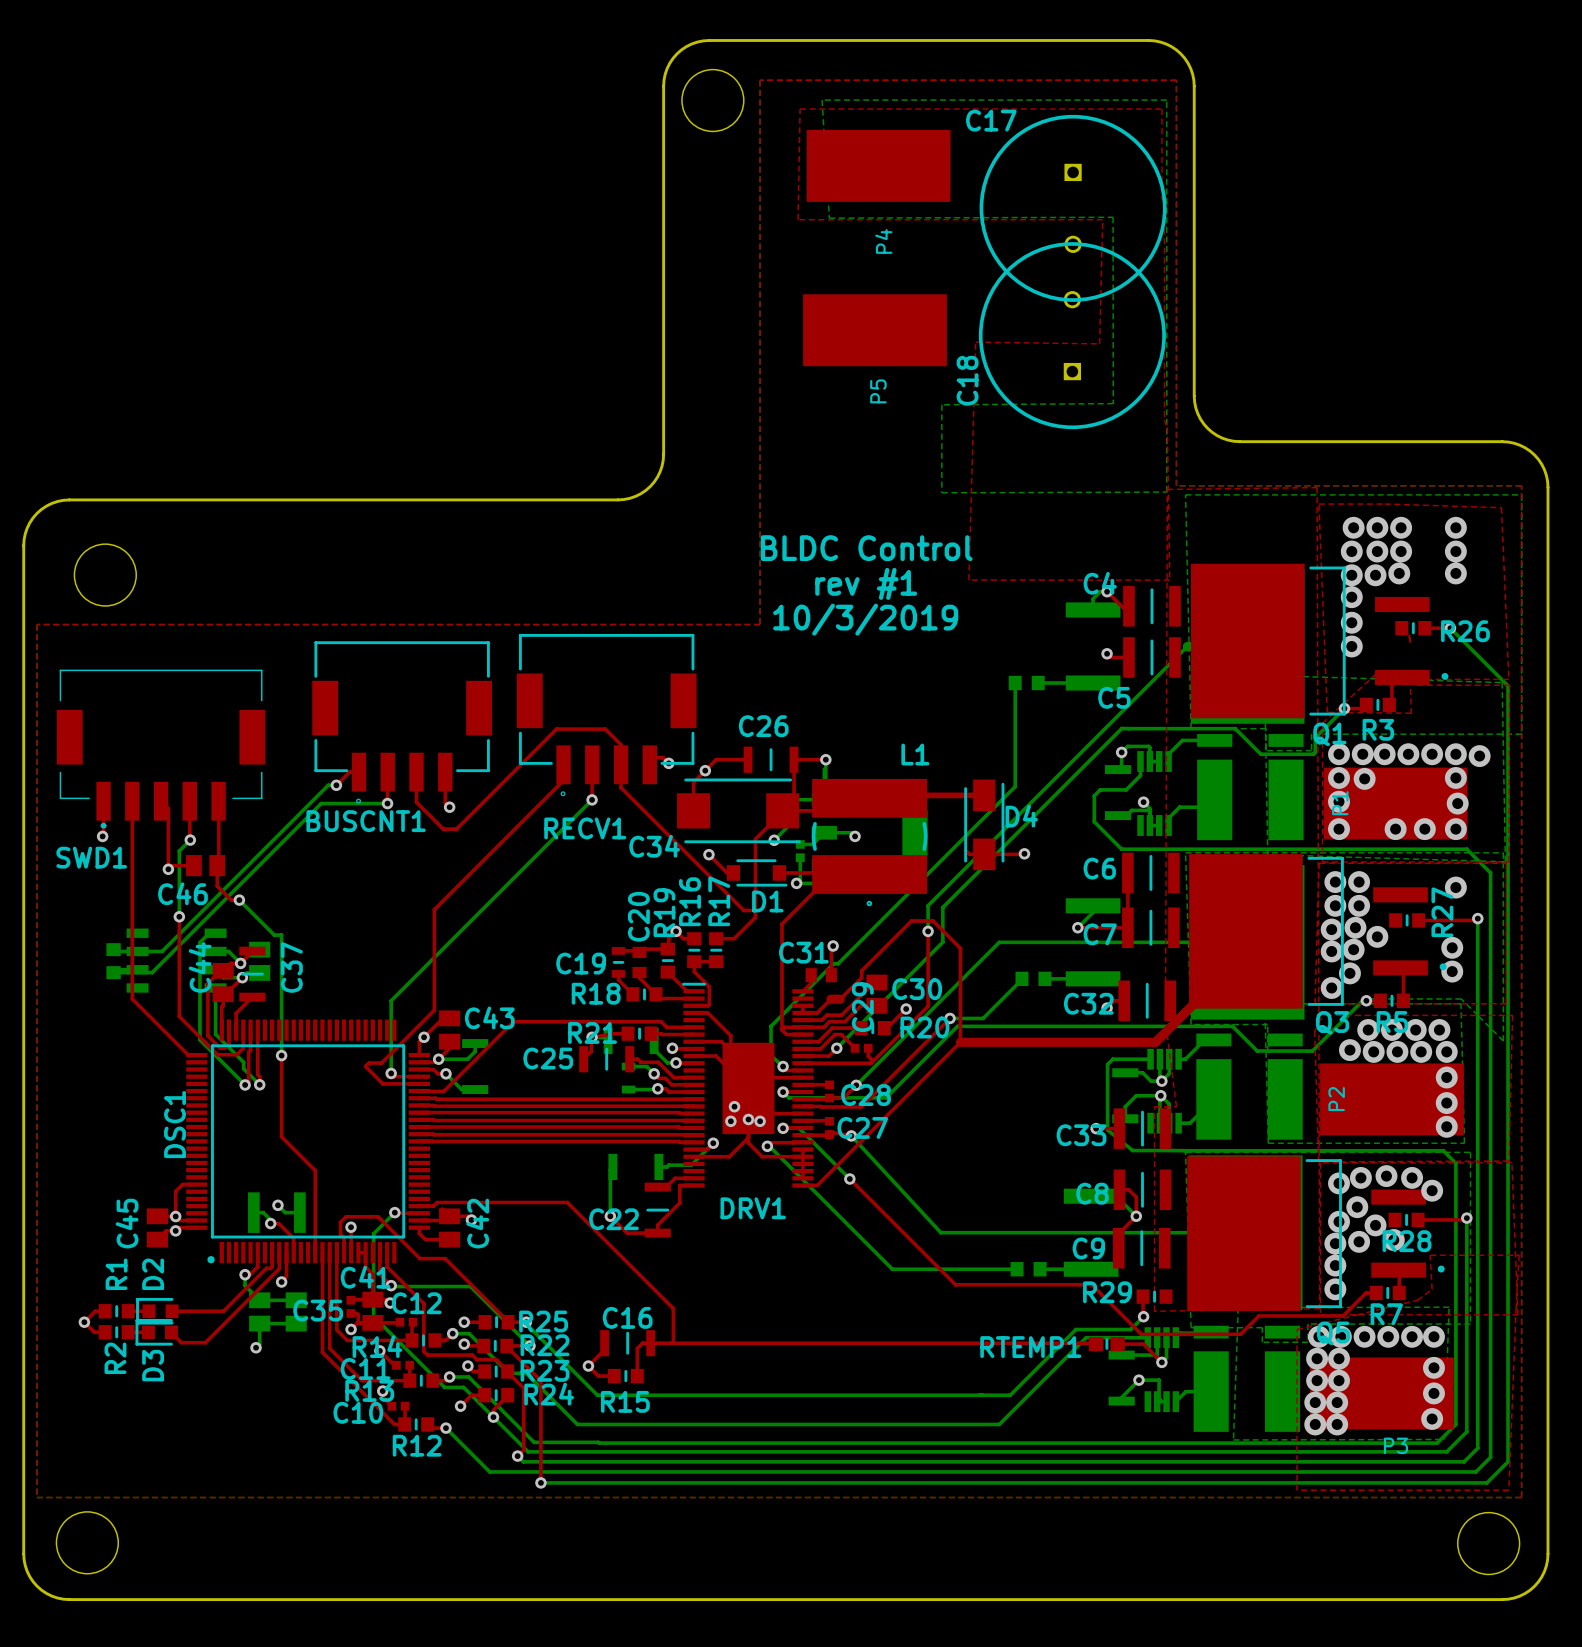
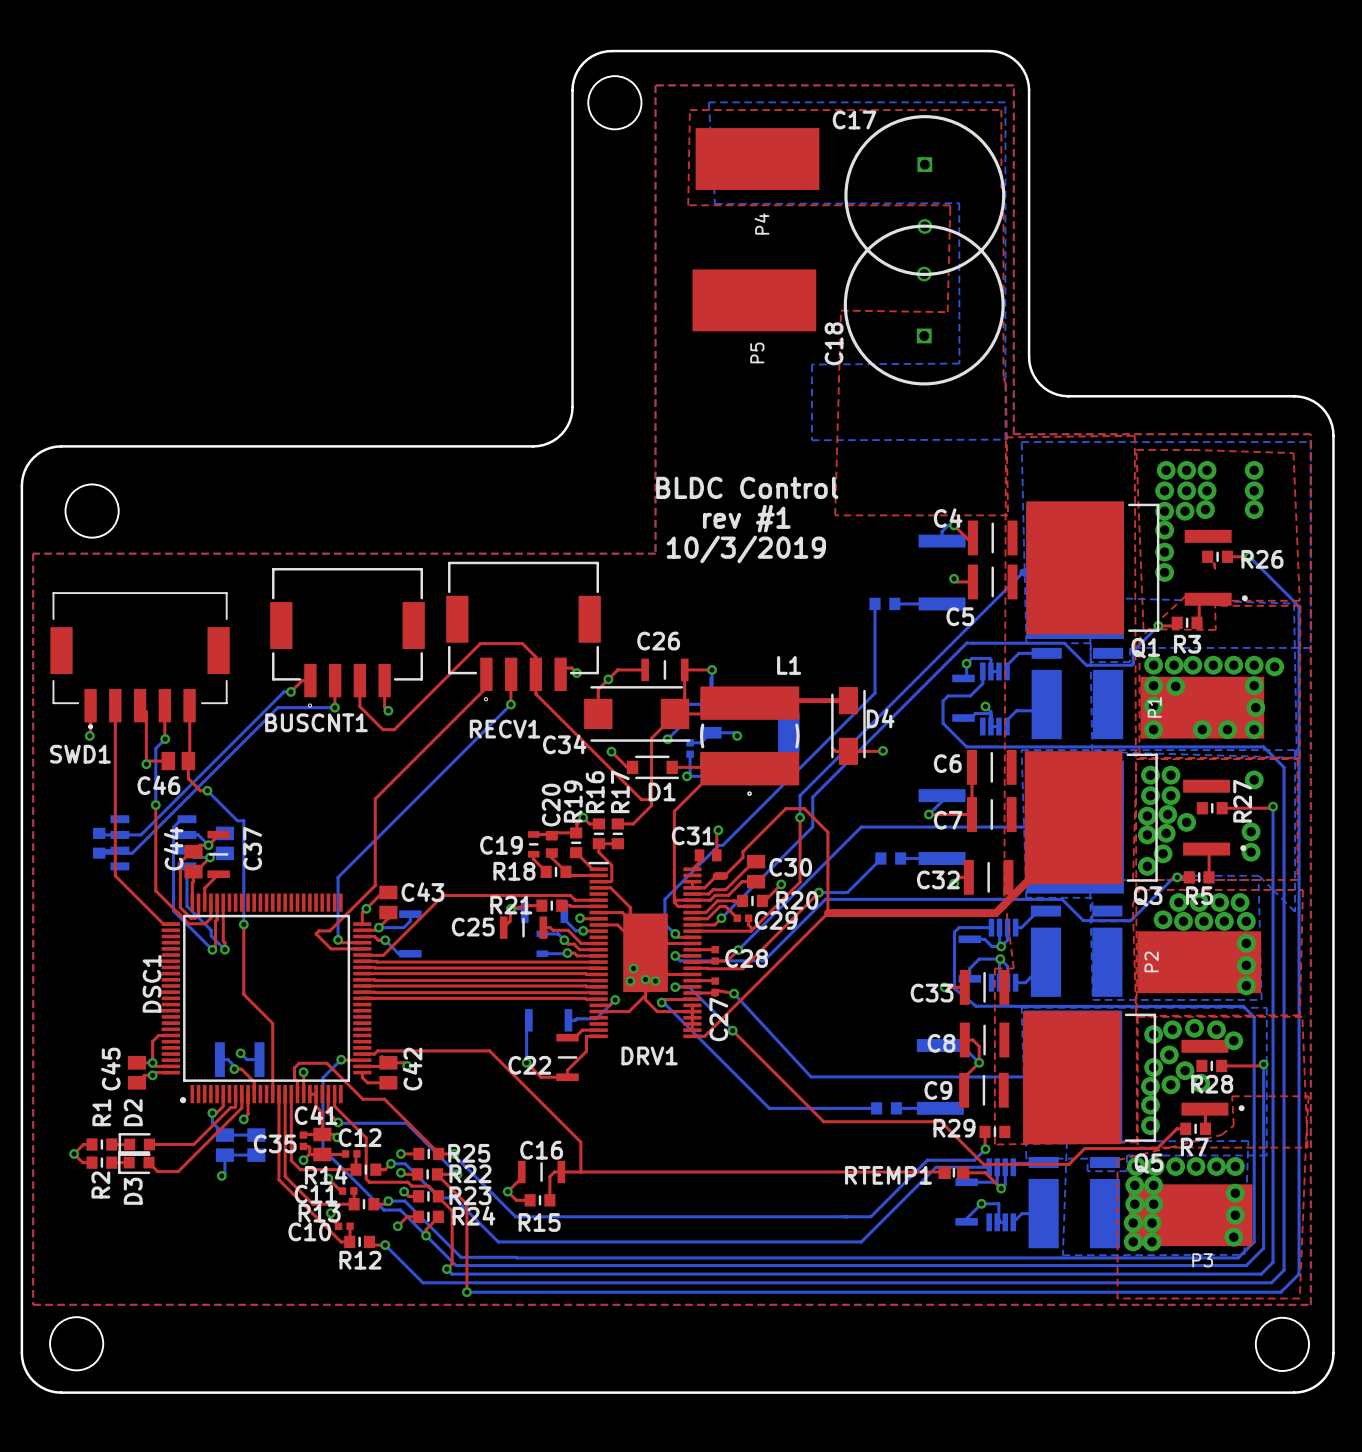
C29 name rotation: 0° (862, 1007) -> 90° clockwise (776, 920)
C27 name rotation: 0° (862, 1127) -> 90° counterclockwise (718, 1019)

